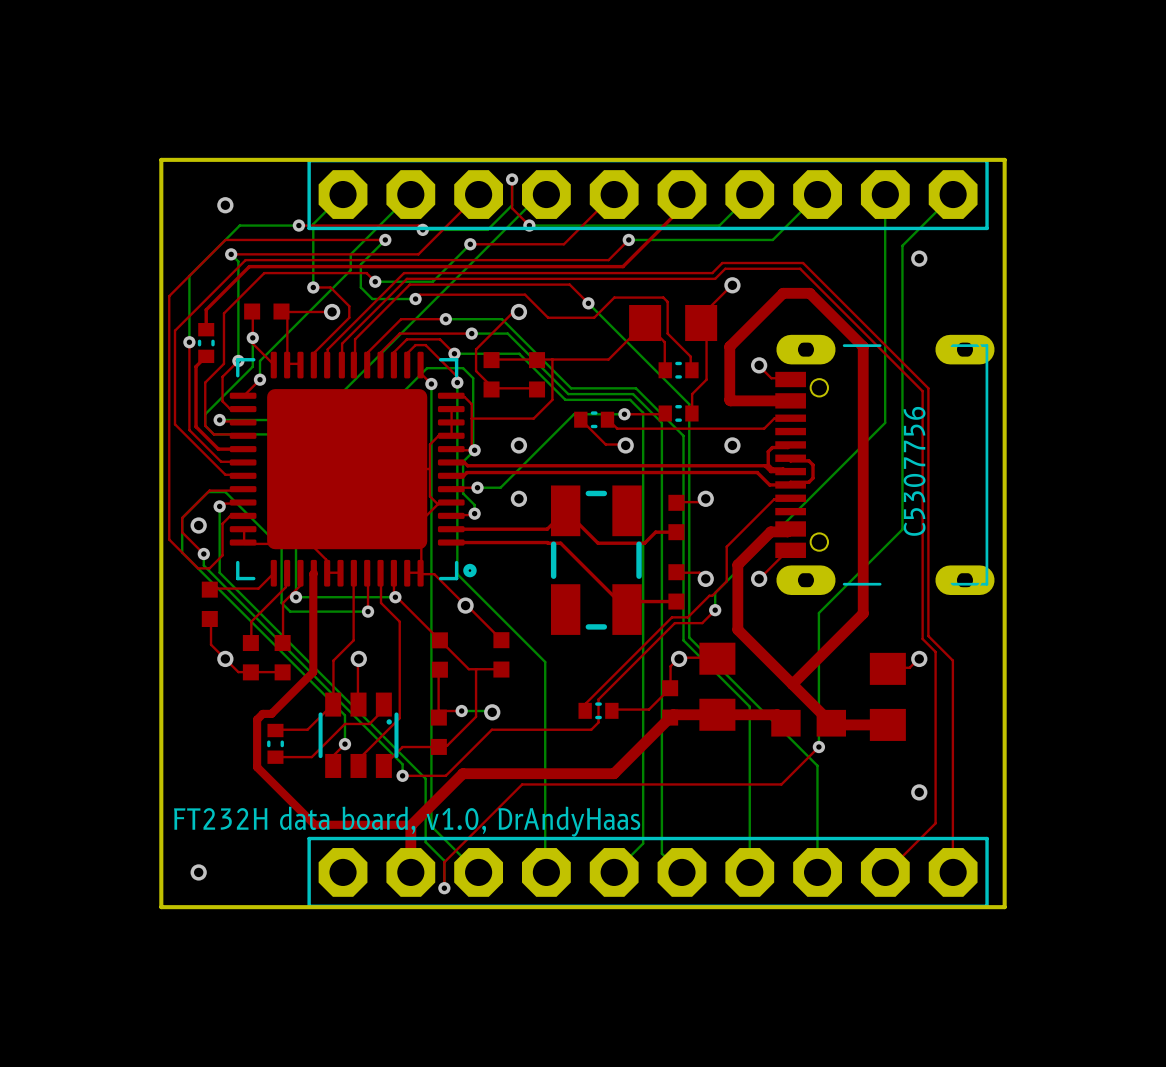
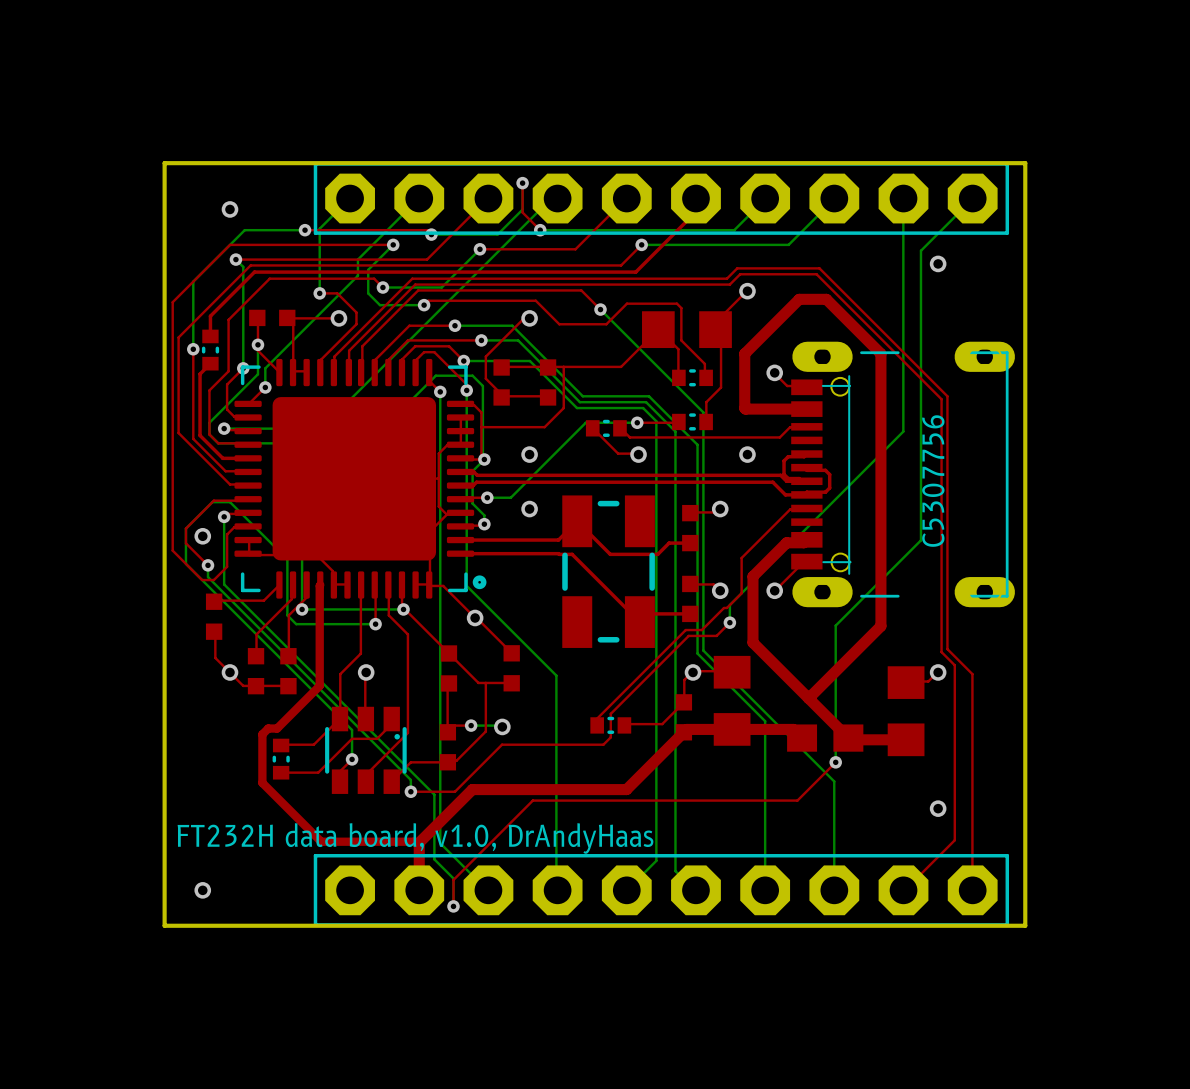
part footprint: [775, 334, 995, 596] -> [791, 341, 1015, 608]

